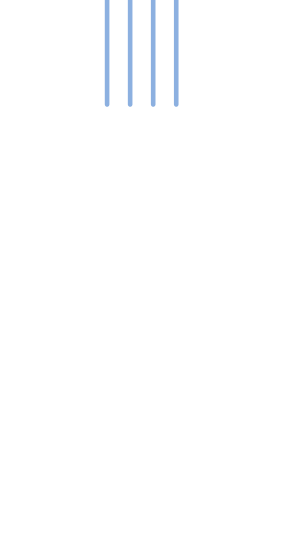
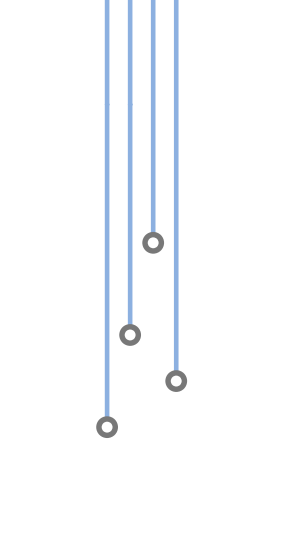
track: none -> (107, 104) (107, 427)
track: none -> (130, 104) (130, 334)
track: none -> (153, 104) (153, 242)
track: none -> (176, 104) (176, 381)
via: none -> (153, 242)
via: none -> (130, 334)
via: none -> (176, 381)
via: none -> (107, 427)

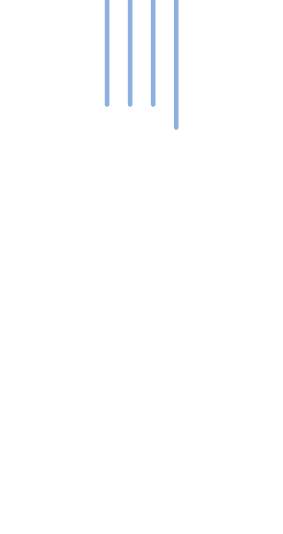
track: (107, 104) (107, 427) -> none
track: (130, 104) (130, 334) -> none
track: (153, 104) (153, 242) -> none
track: (176, 127) (176, 381) -> none
via: (153, 242) -> none
via: (130, 334) -> none
via: (176, 381) -> none
via: (107, 427) -> none

